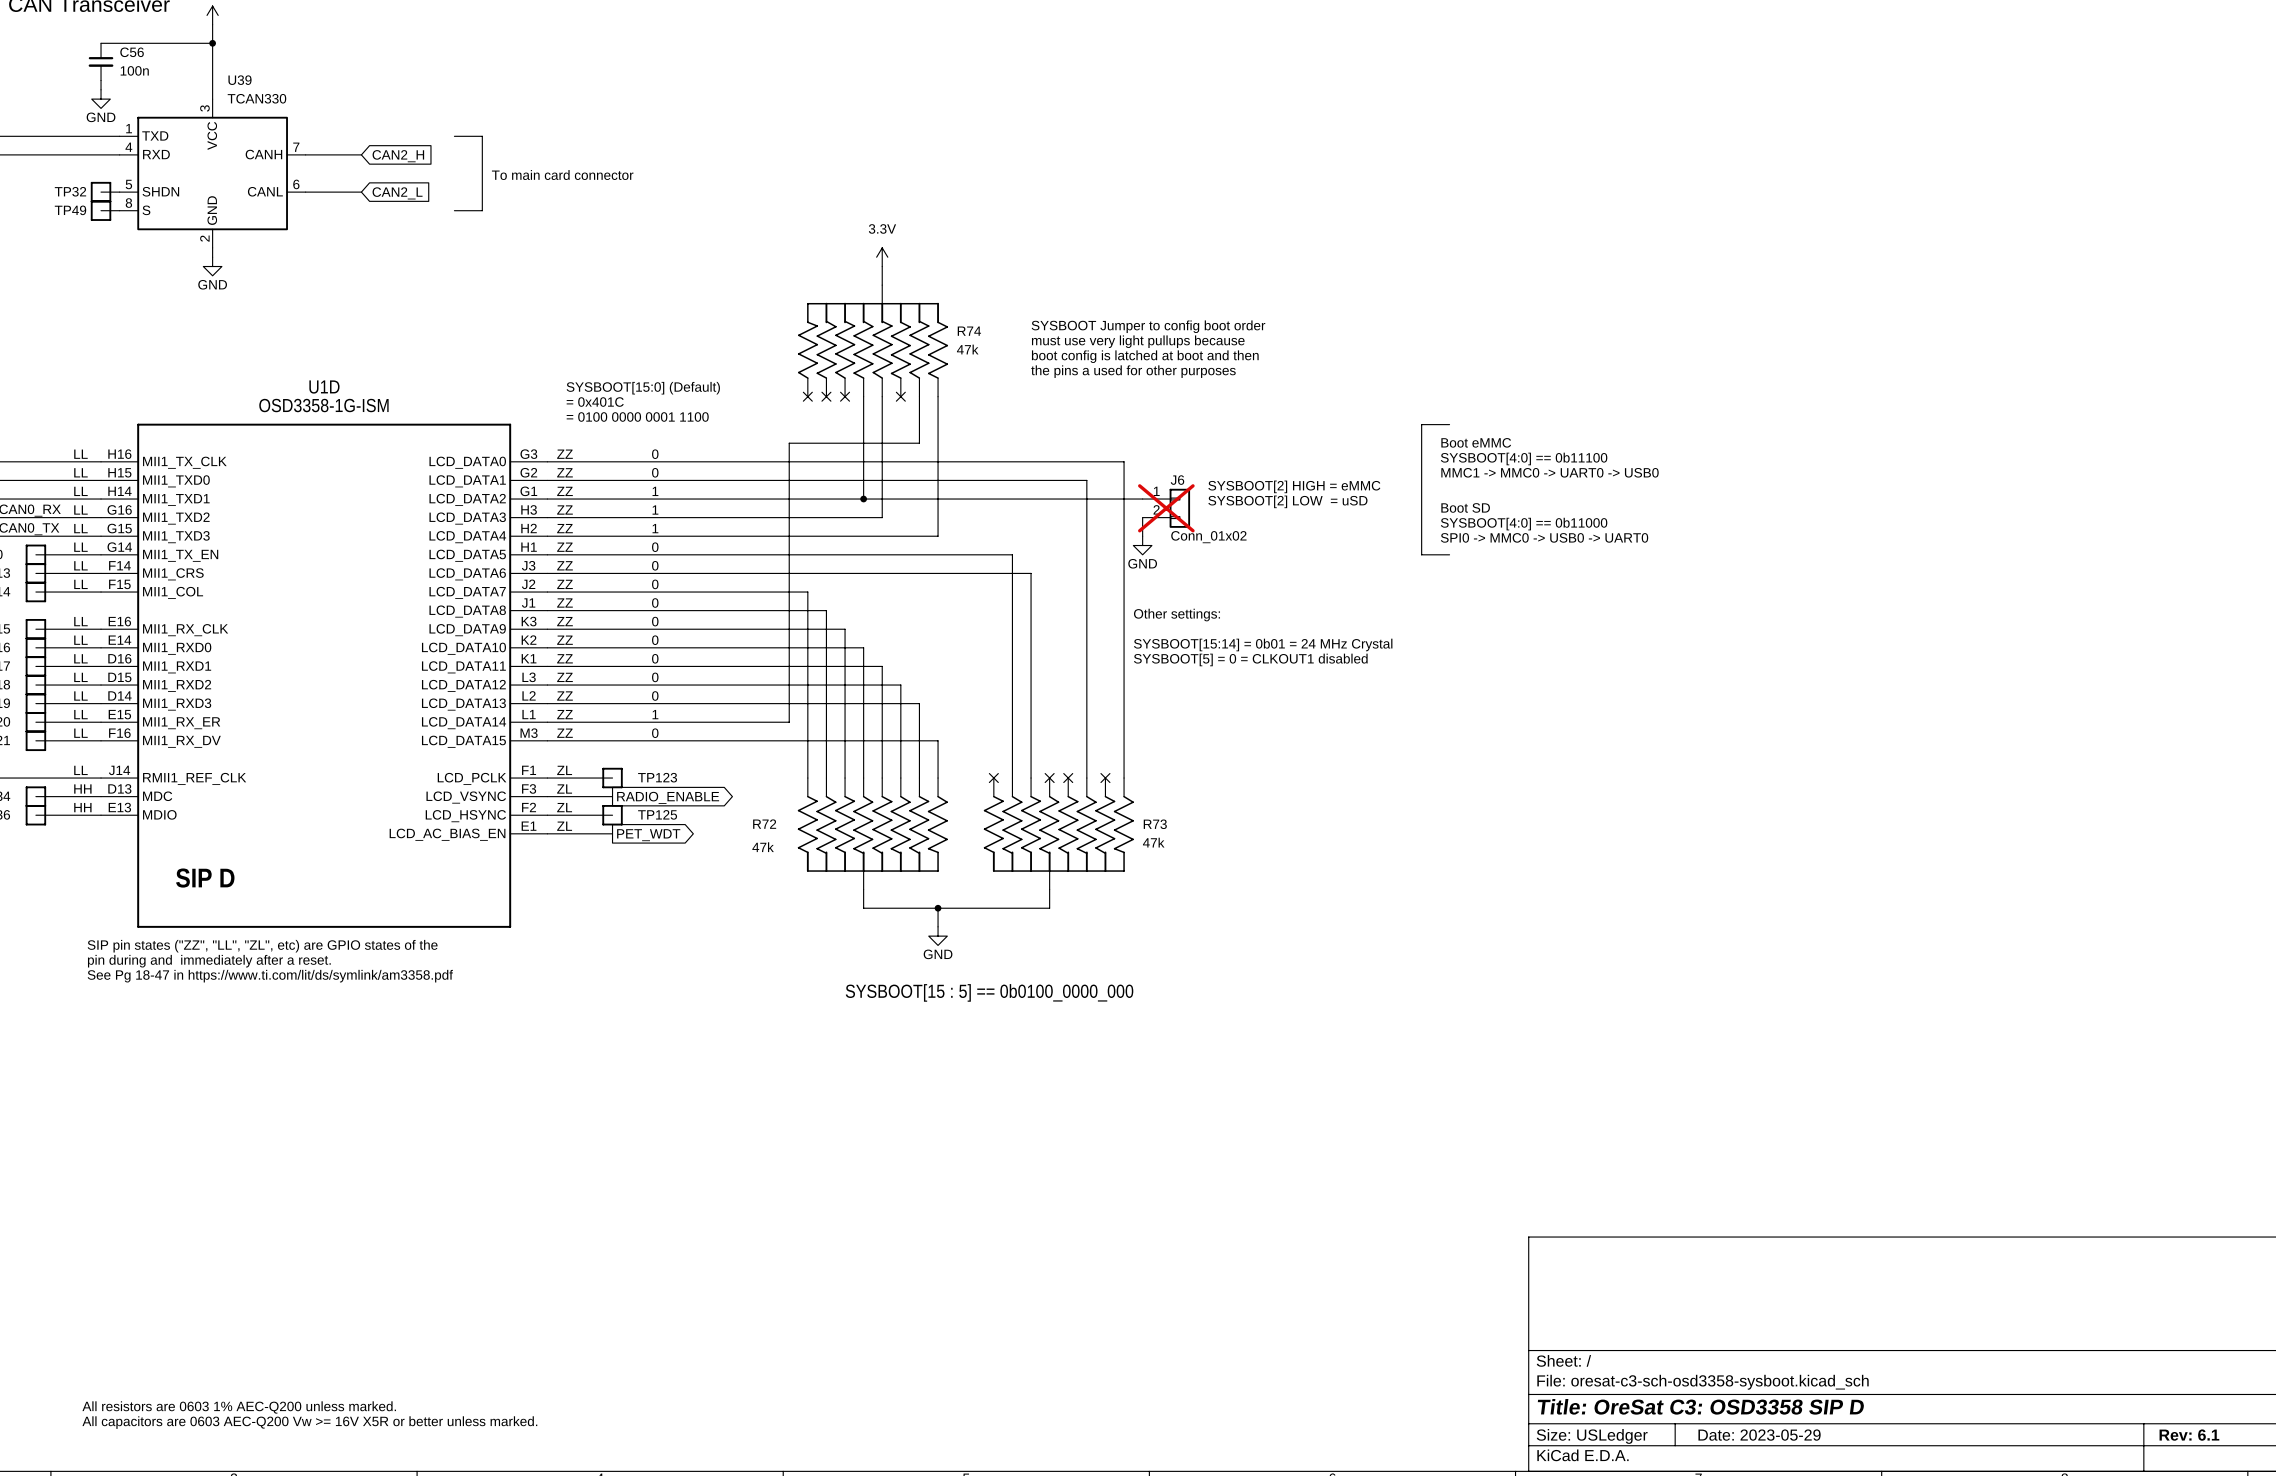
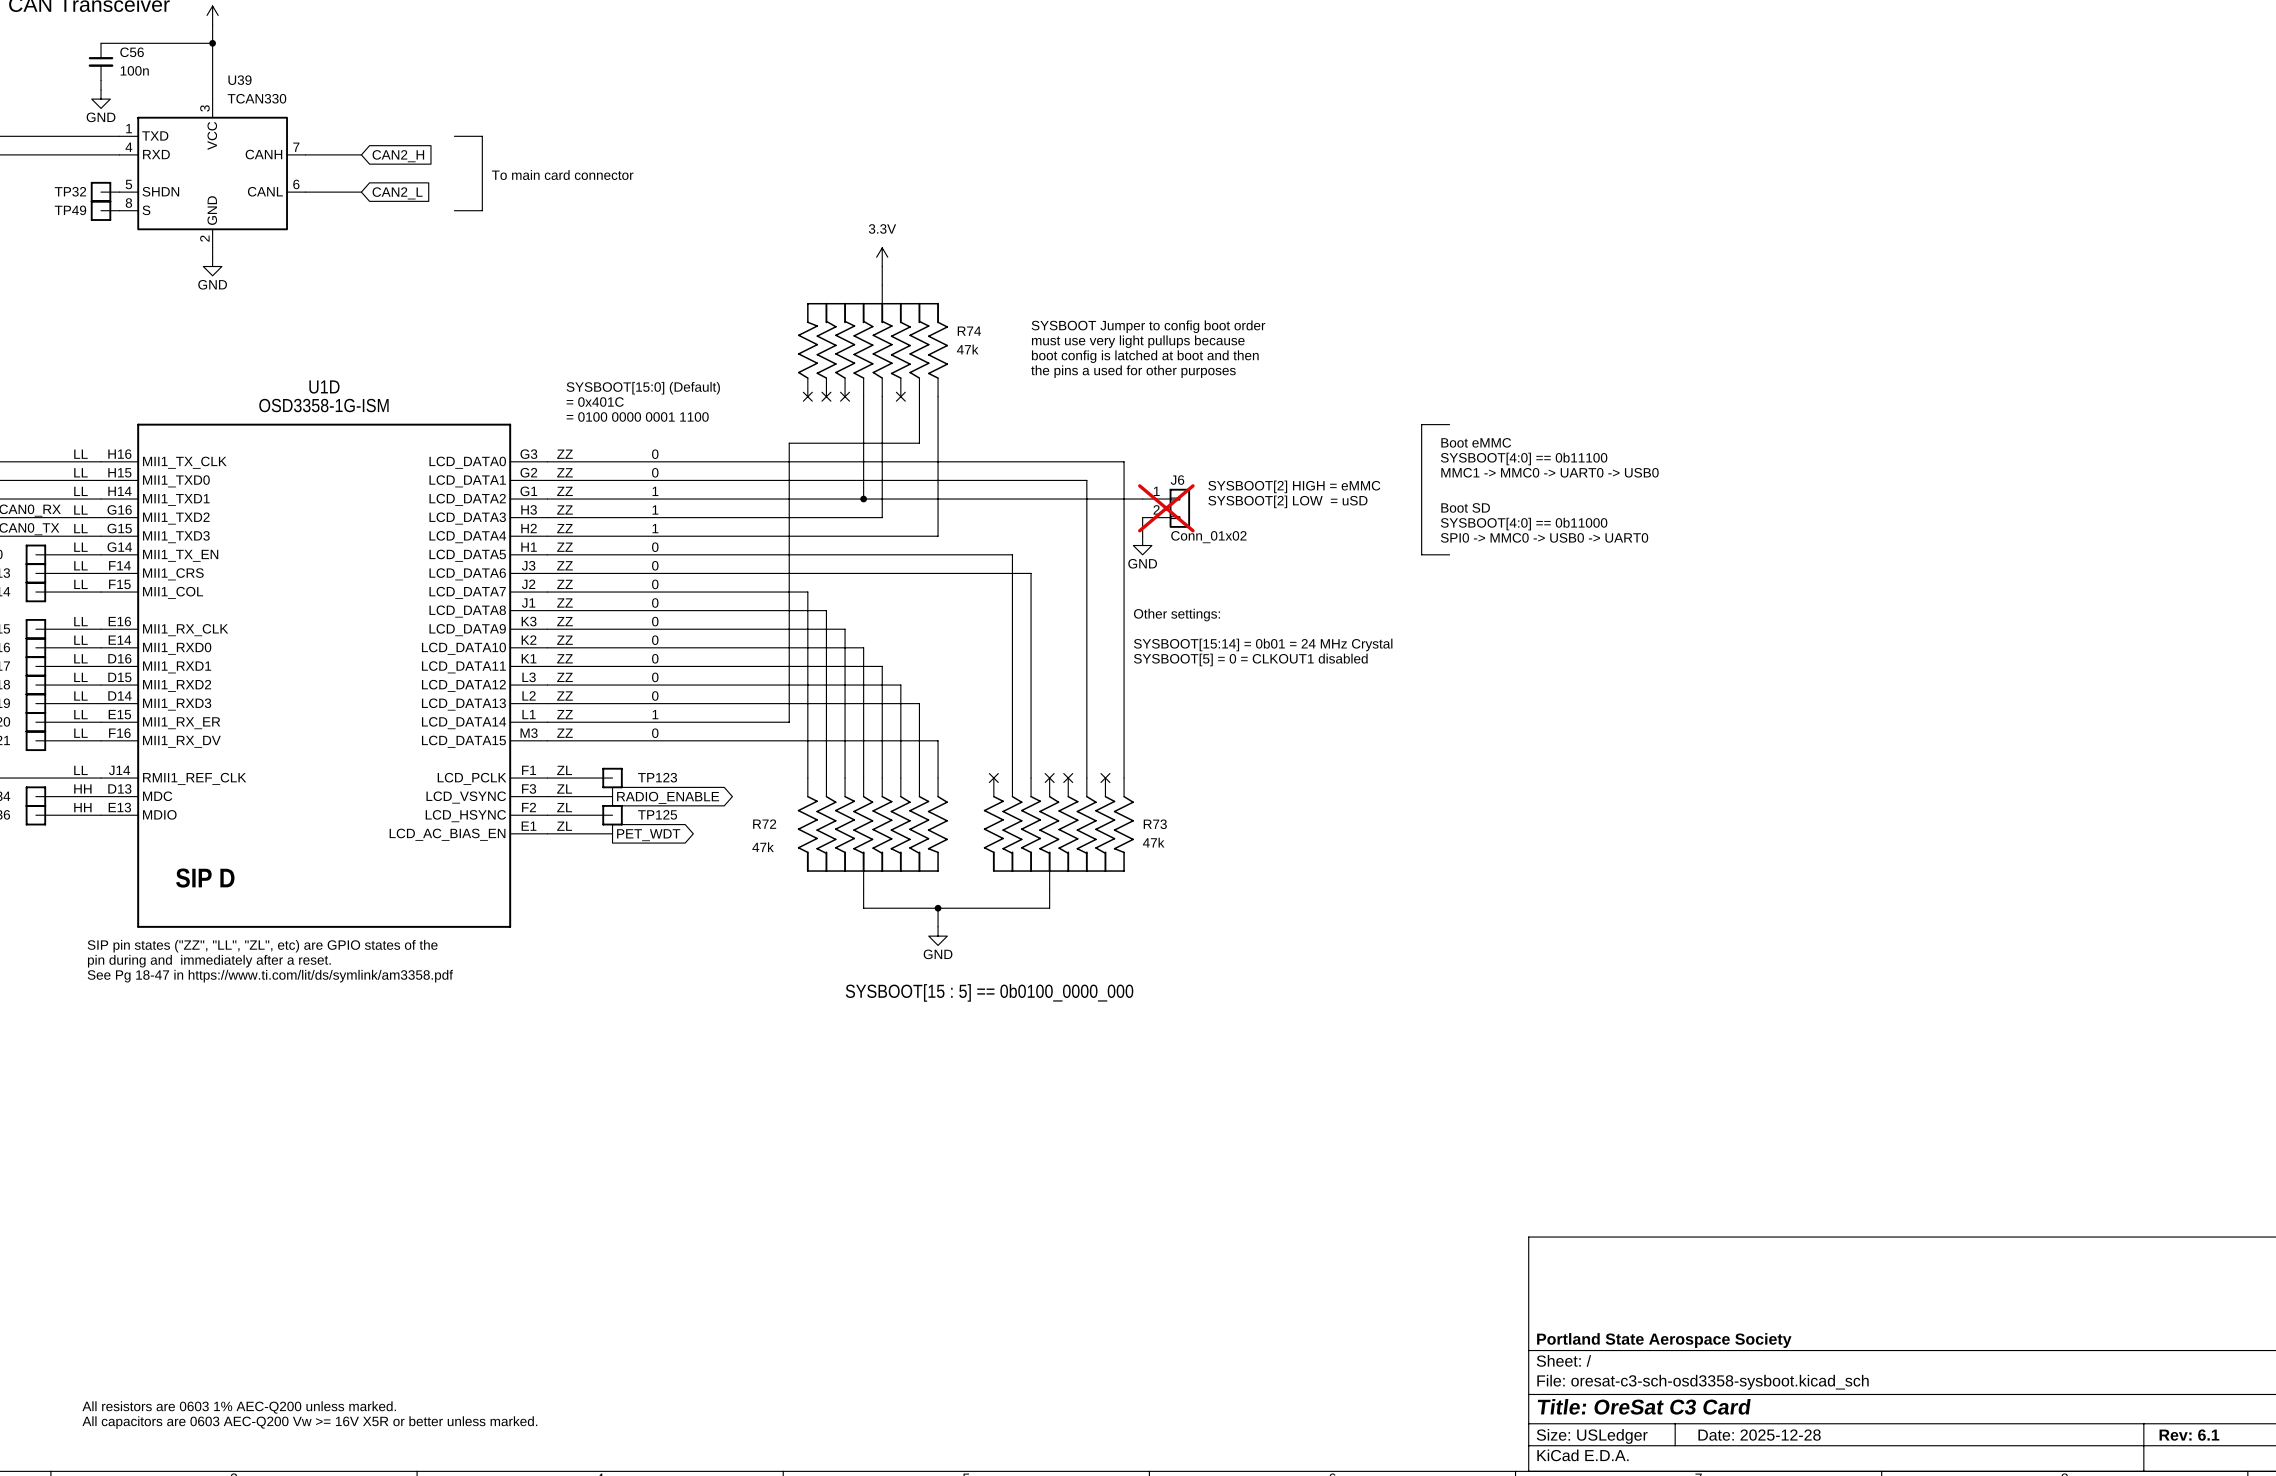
title block: none -> Portland State Aerospace Society (1664, 1340)
title block: Title: OreSat C3: OSD3358 SIP D (1701, 1406) -> Title: OreSat C3 Card (1644, 1406)
title block: Date: 2023-05-29 (1759, 1435) -> Date: 2025-12-28 (1759, 1435)

